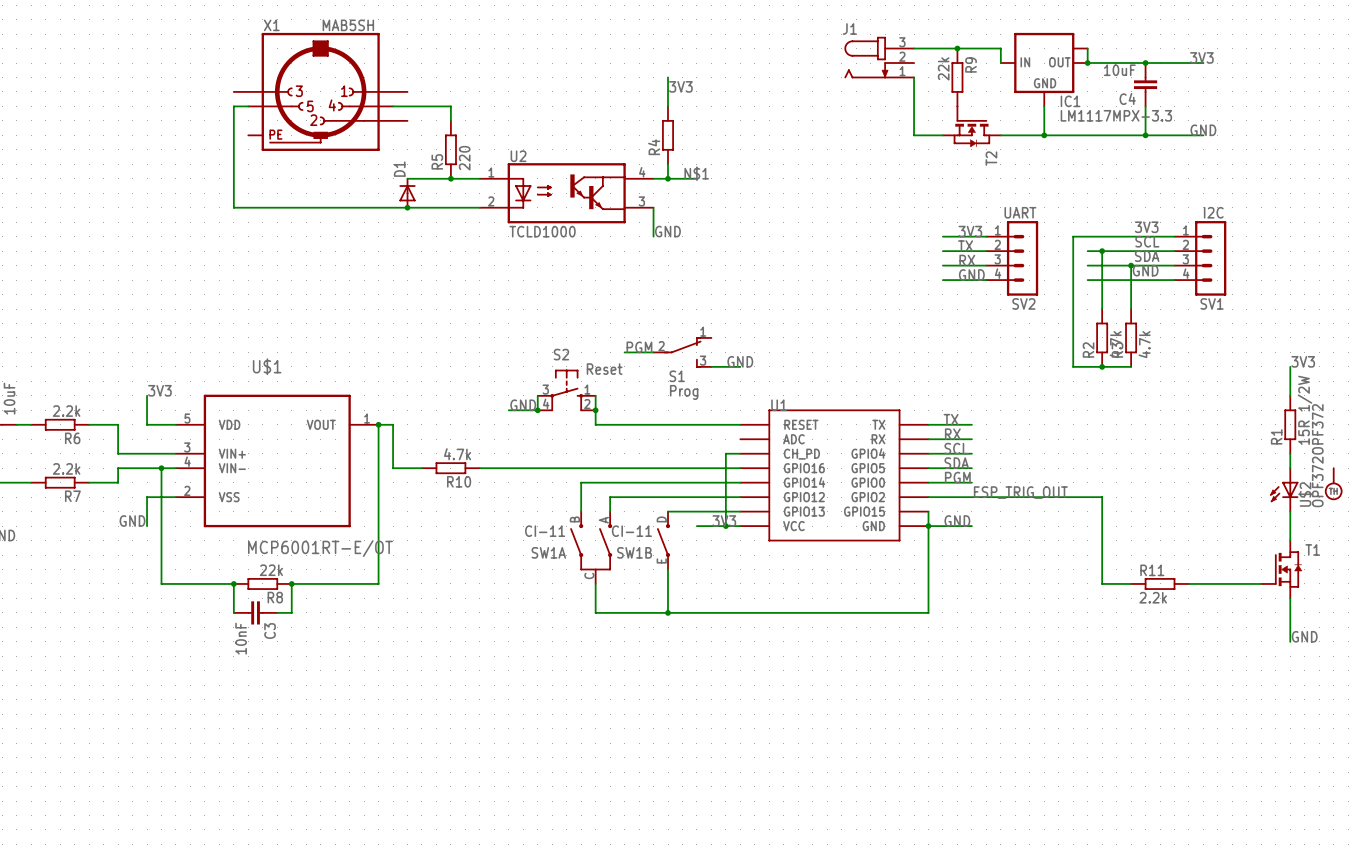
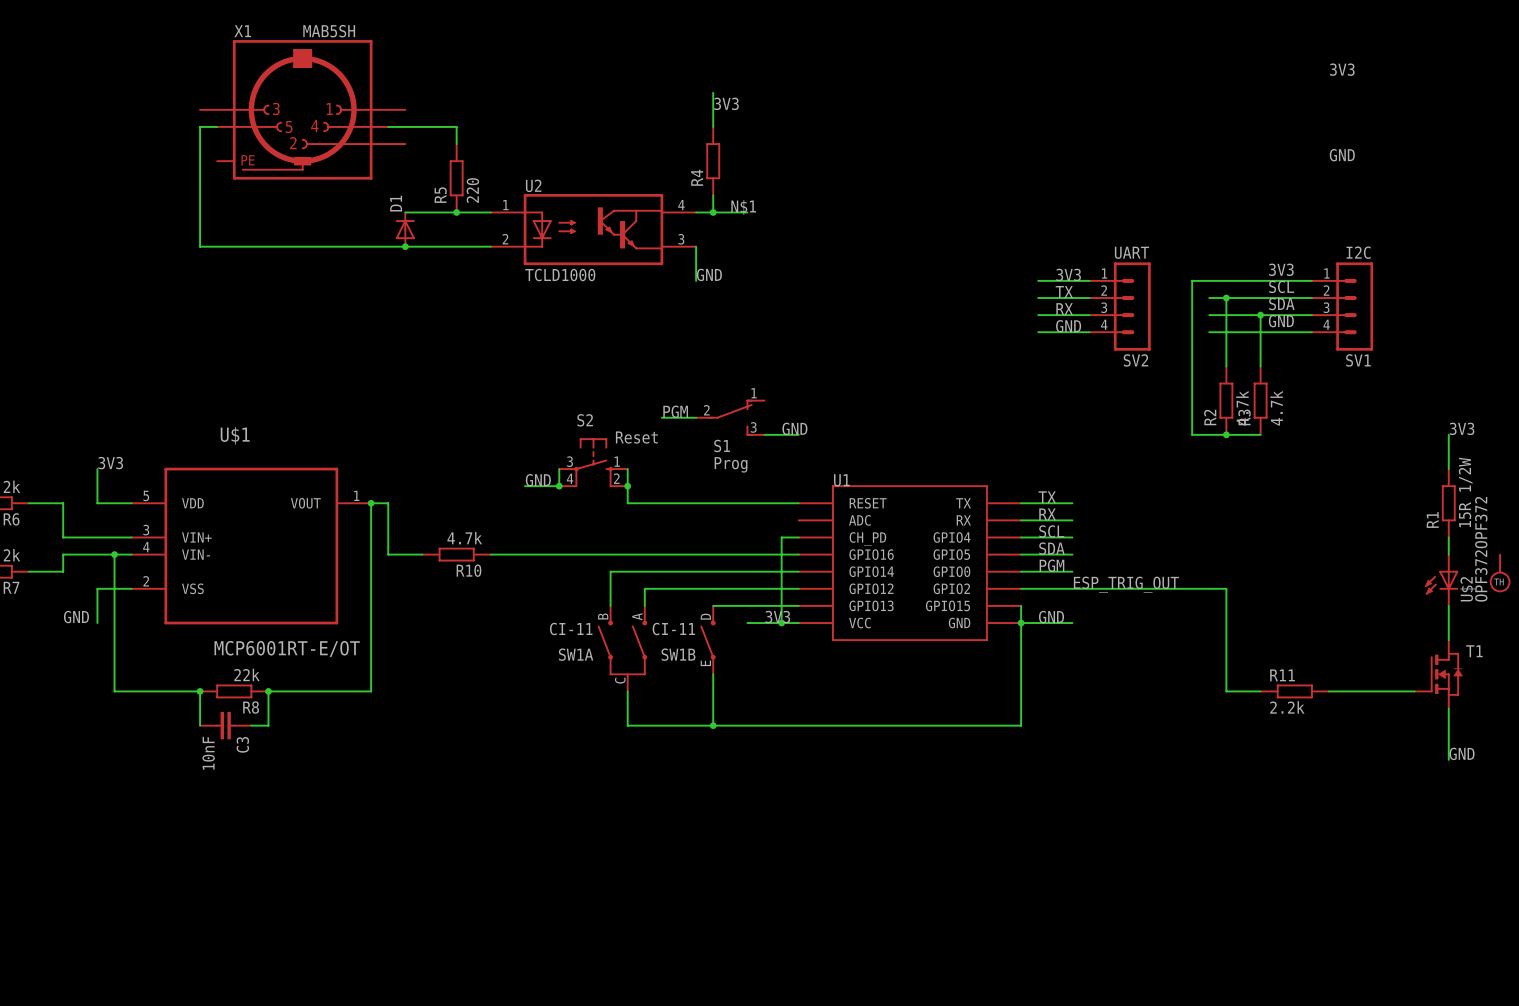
wire: (914, 48) (1000, 48) (1000, 63) -> none
junction: (957, 48) -> none
wire: (1087, 48) (1087, 63) (1203, 63) -> none
J1: (879, 57) -> none
junction: (1087, 63) -> none
junction: (1145, 63) -> none
IC1: LM1117MPX-3.3 (1044, 69) -> none
wire: (914, 77) (914, 135) (942, 135) -> none
R9: 22k (957, 77) -> none
C4: 10uF (1145, 84) -> none
wire: (1044, 106) (1044, 135) -> none
wire: (1145, 106) (1145, 135) -> none
T2: (971, 126) -> none
wire: (1000, 135) (1203, 135) -> none
junction: (1044, 135) -> none
junction: (1145, 135) -> none

